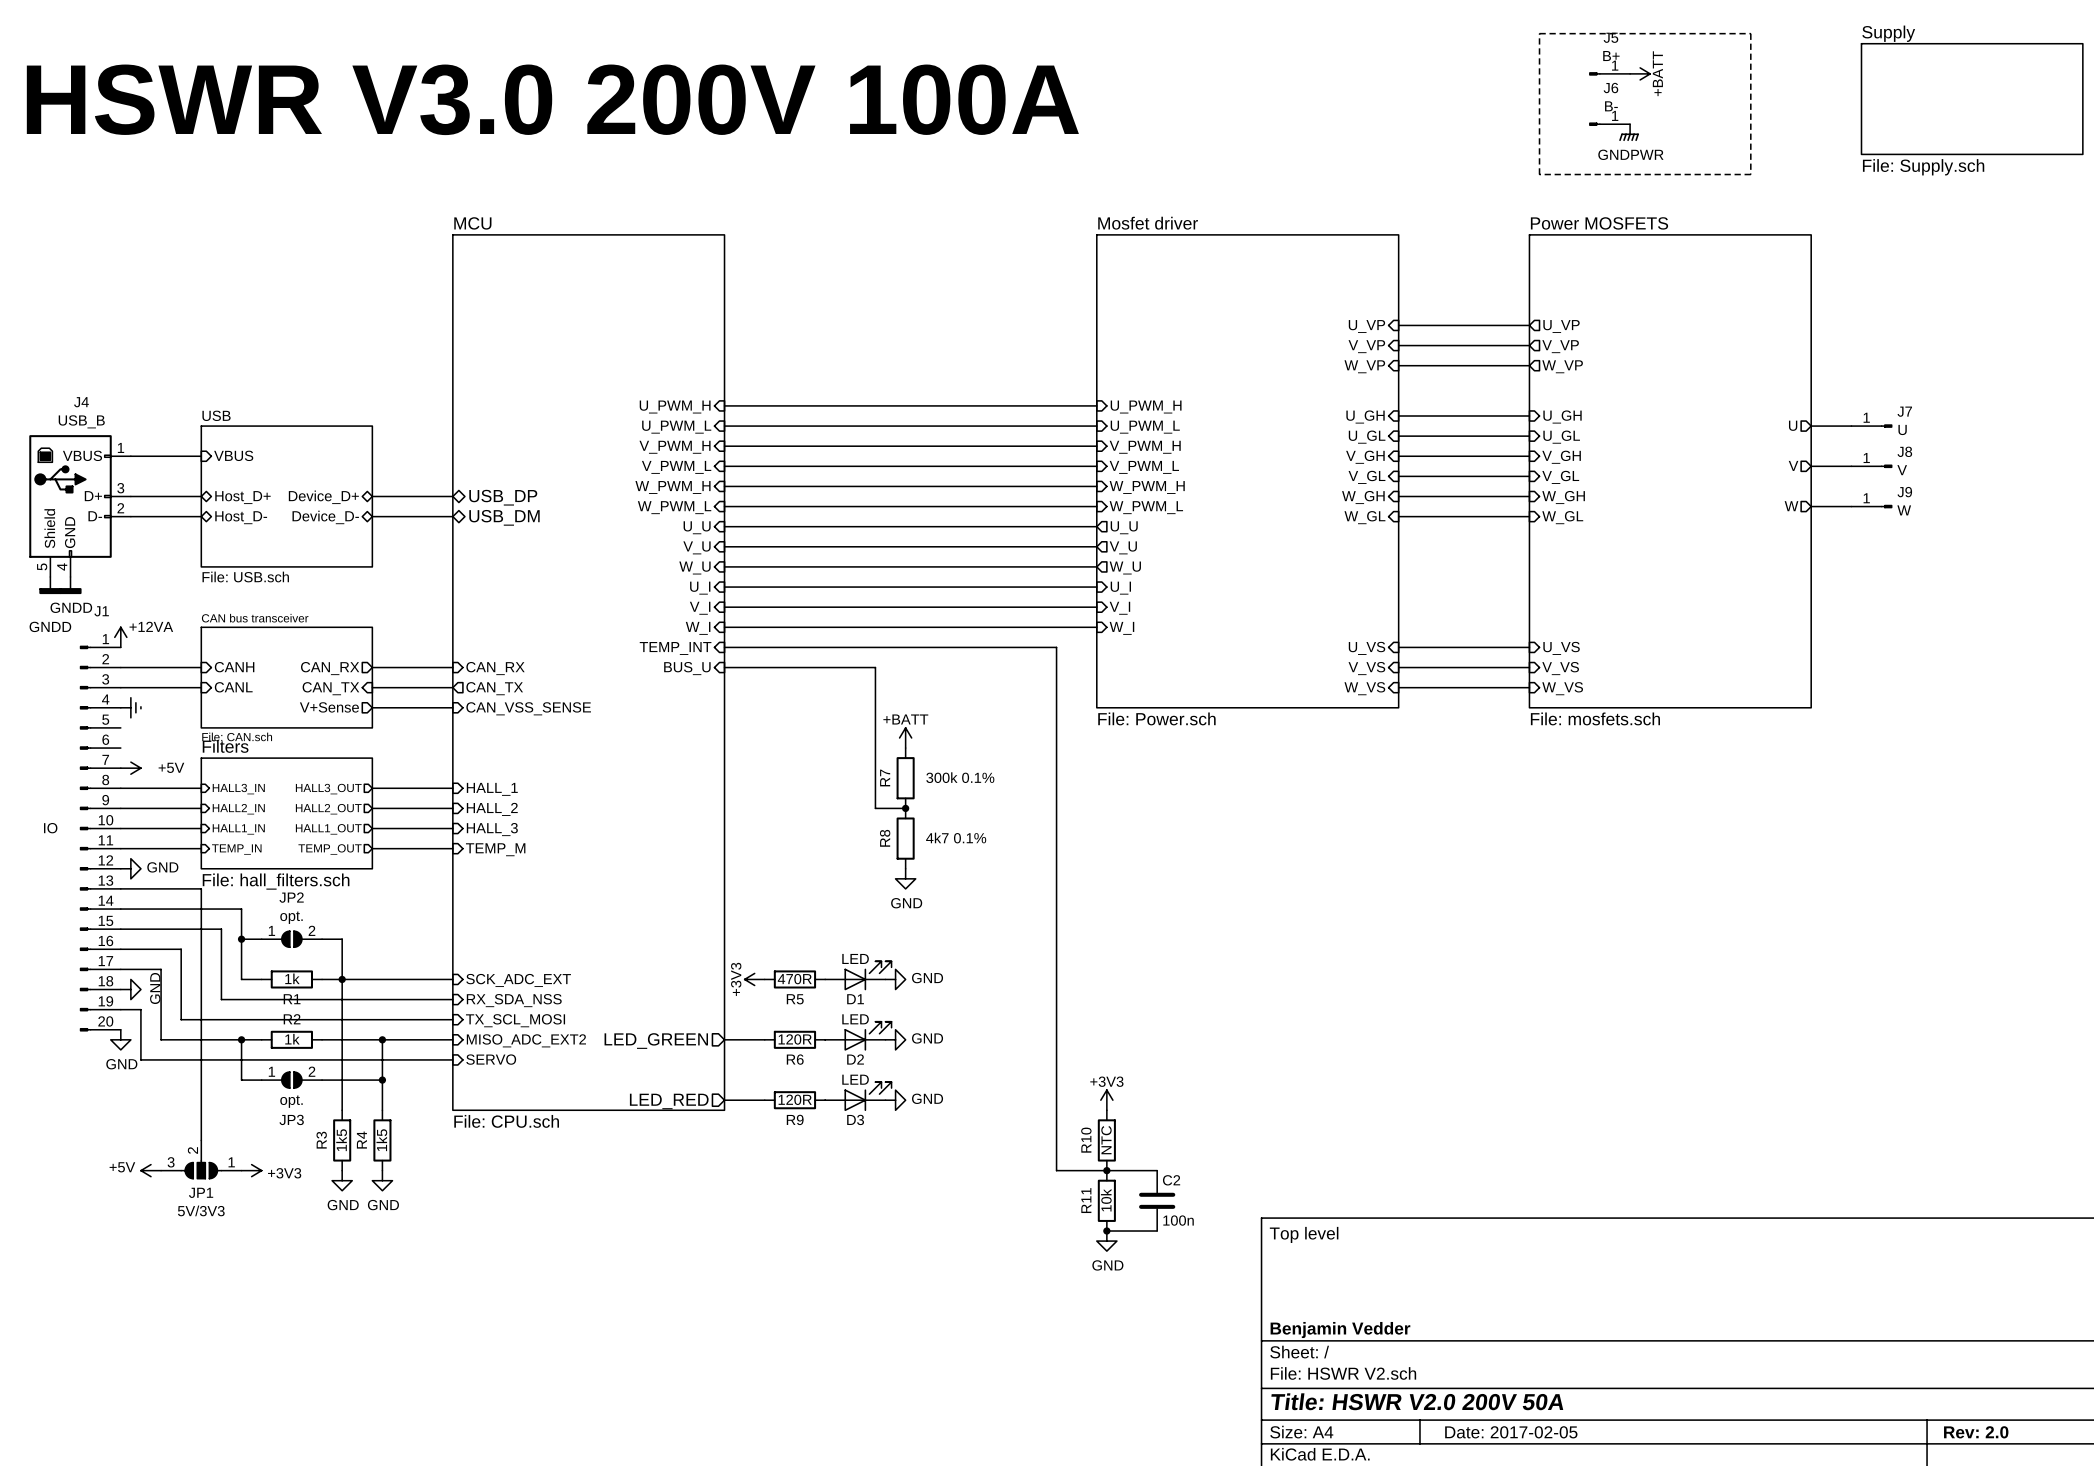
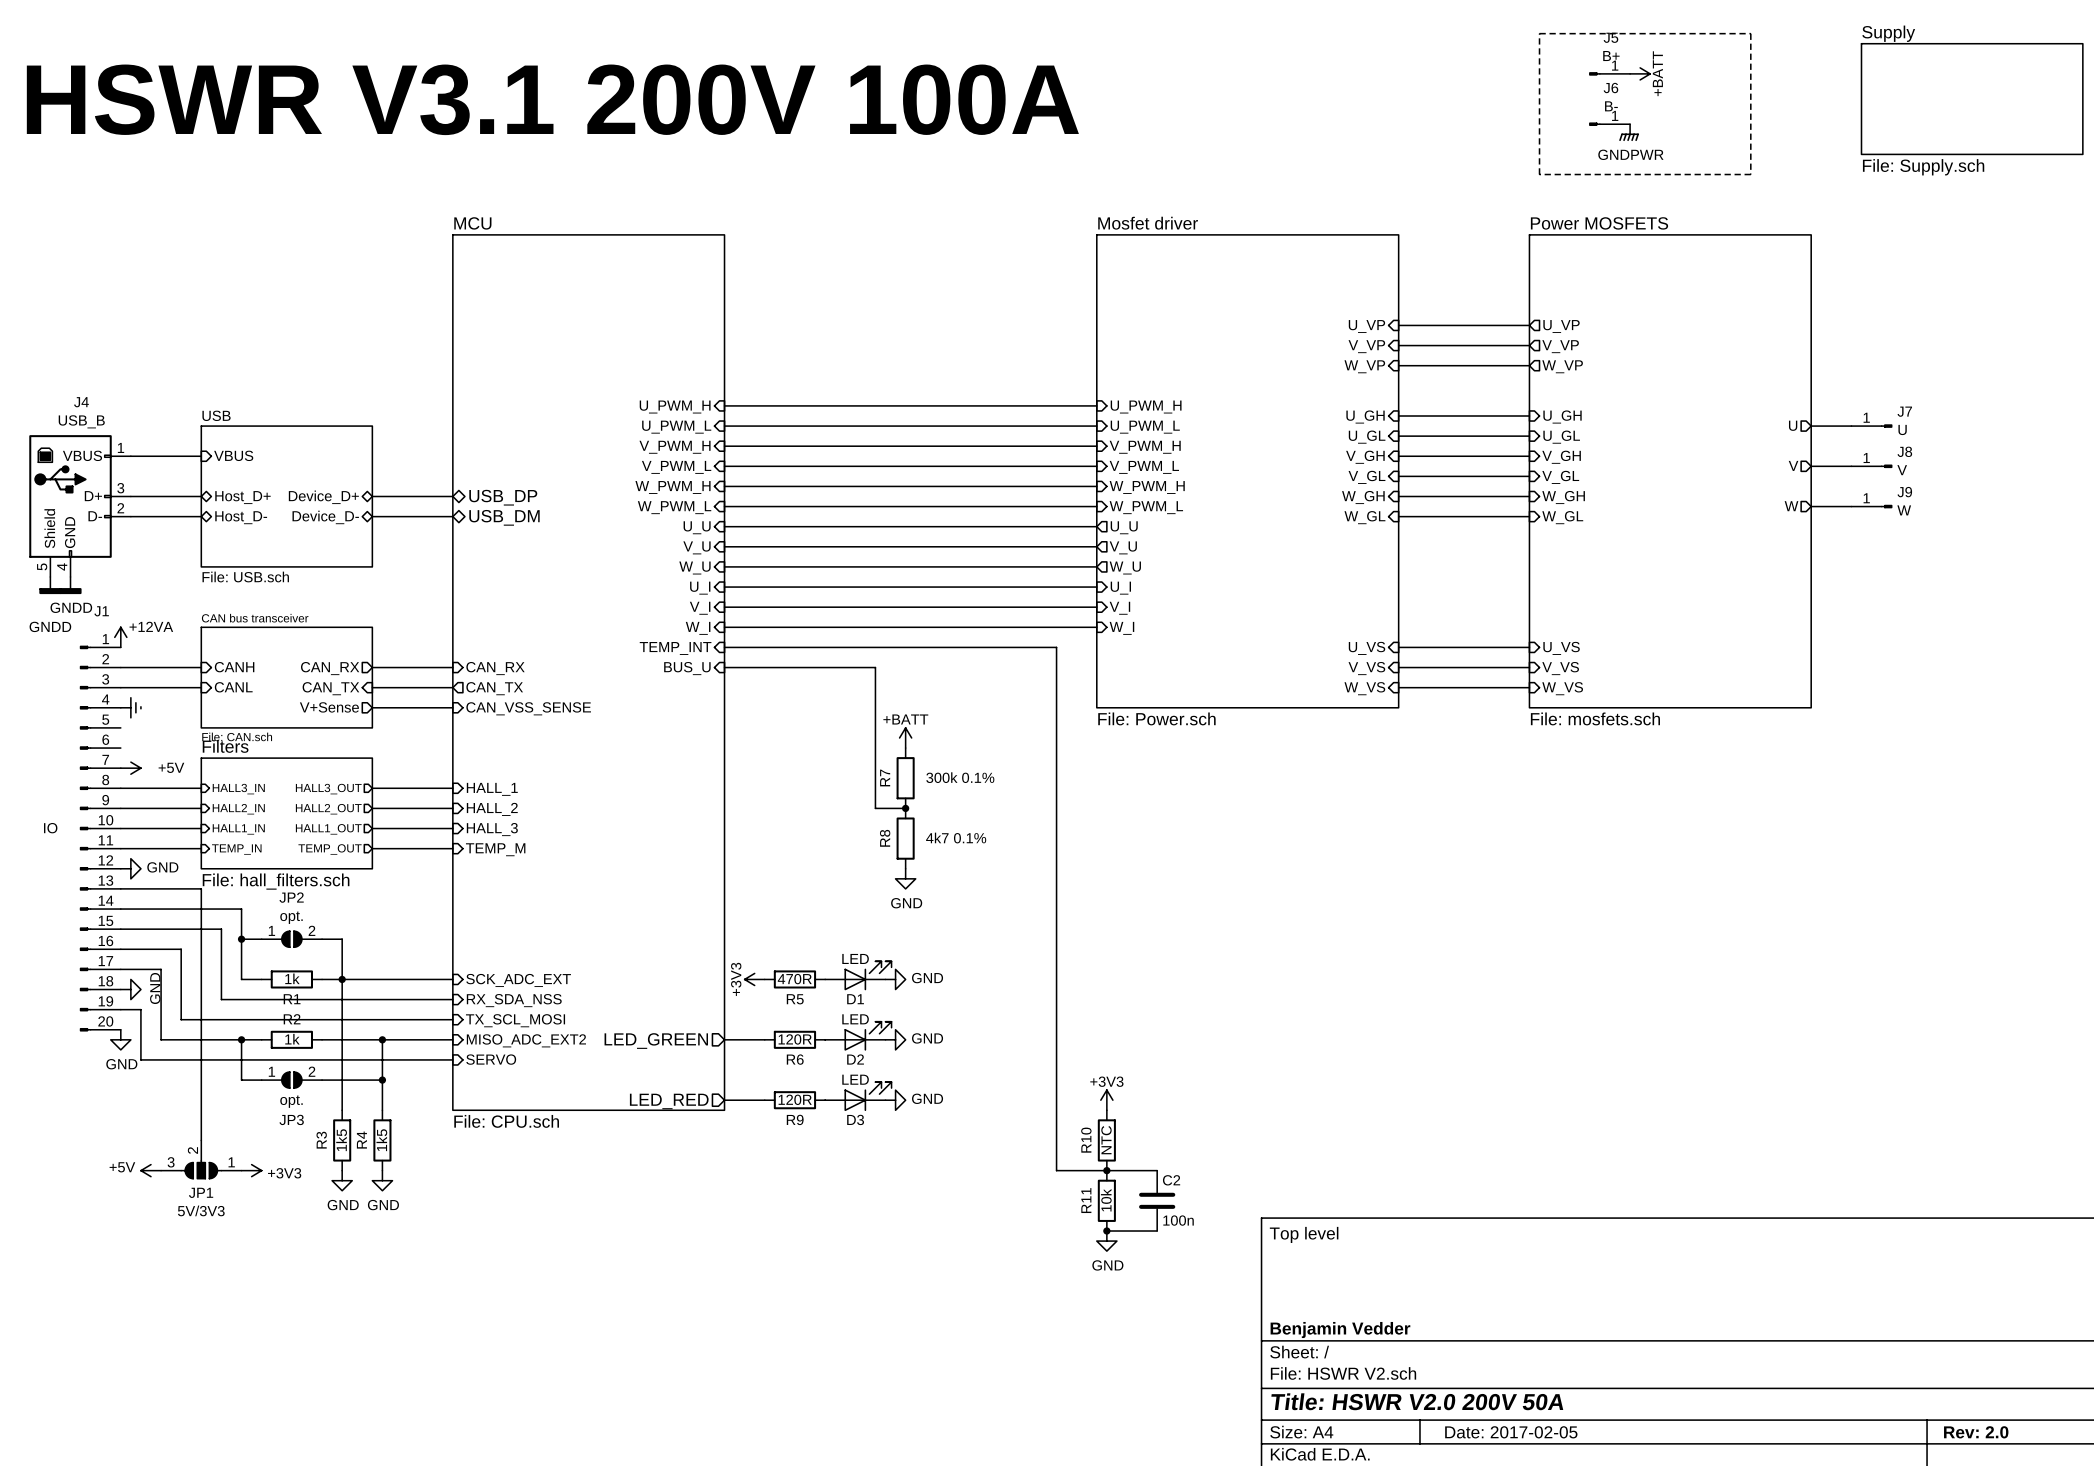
text: HSWR V3.0 200V 100A (552, 99) -> HSWR V3.1 200V 100A (552, 99)

